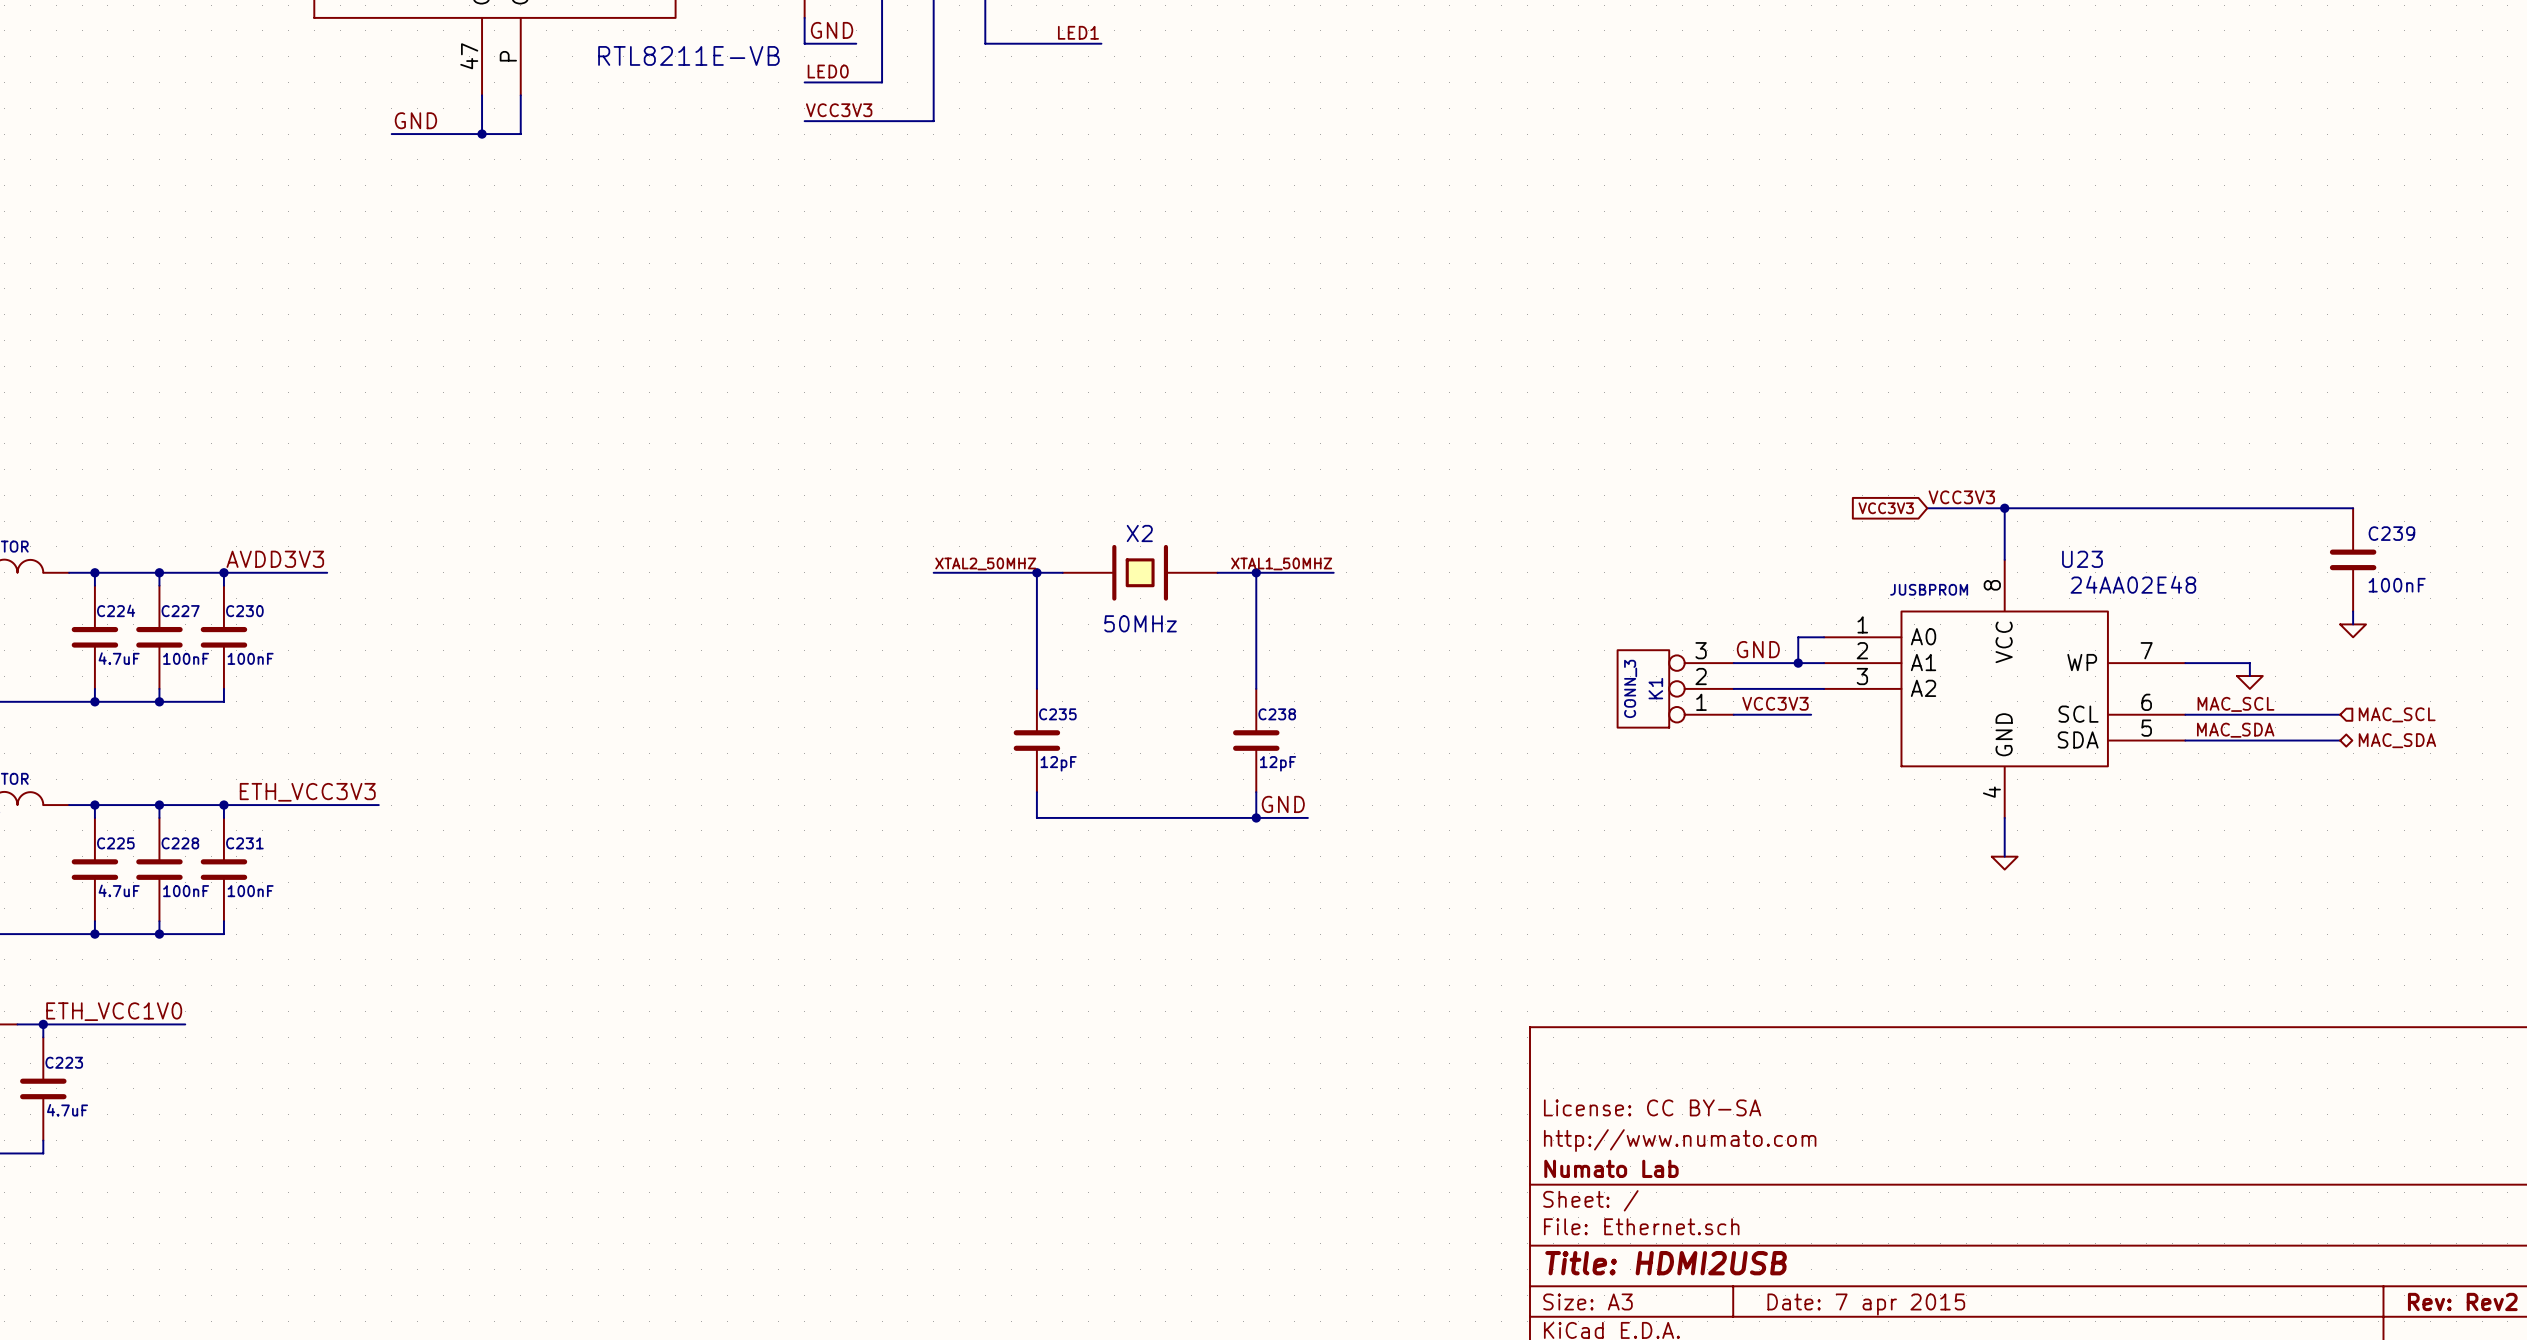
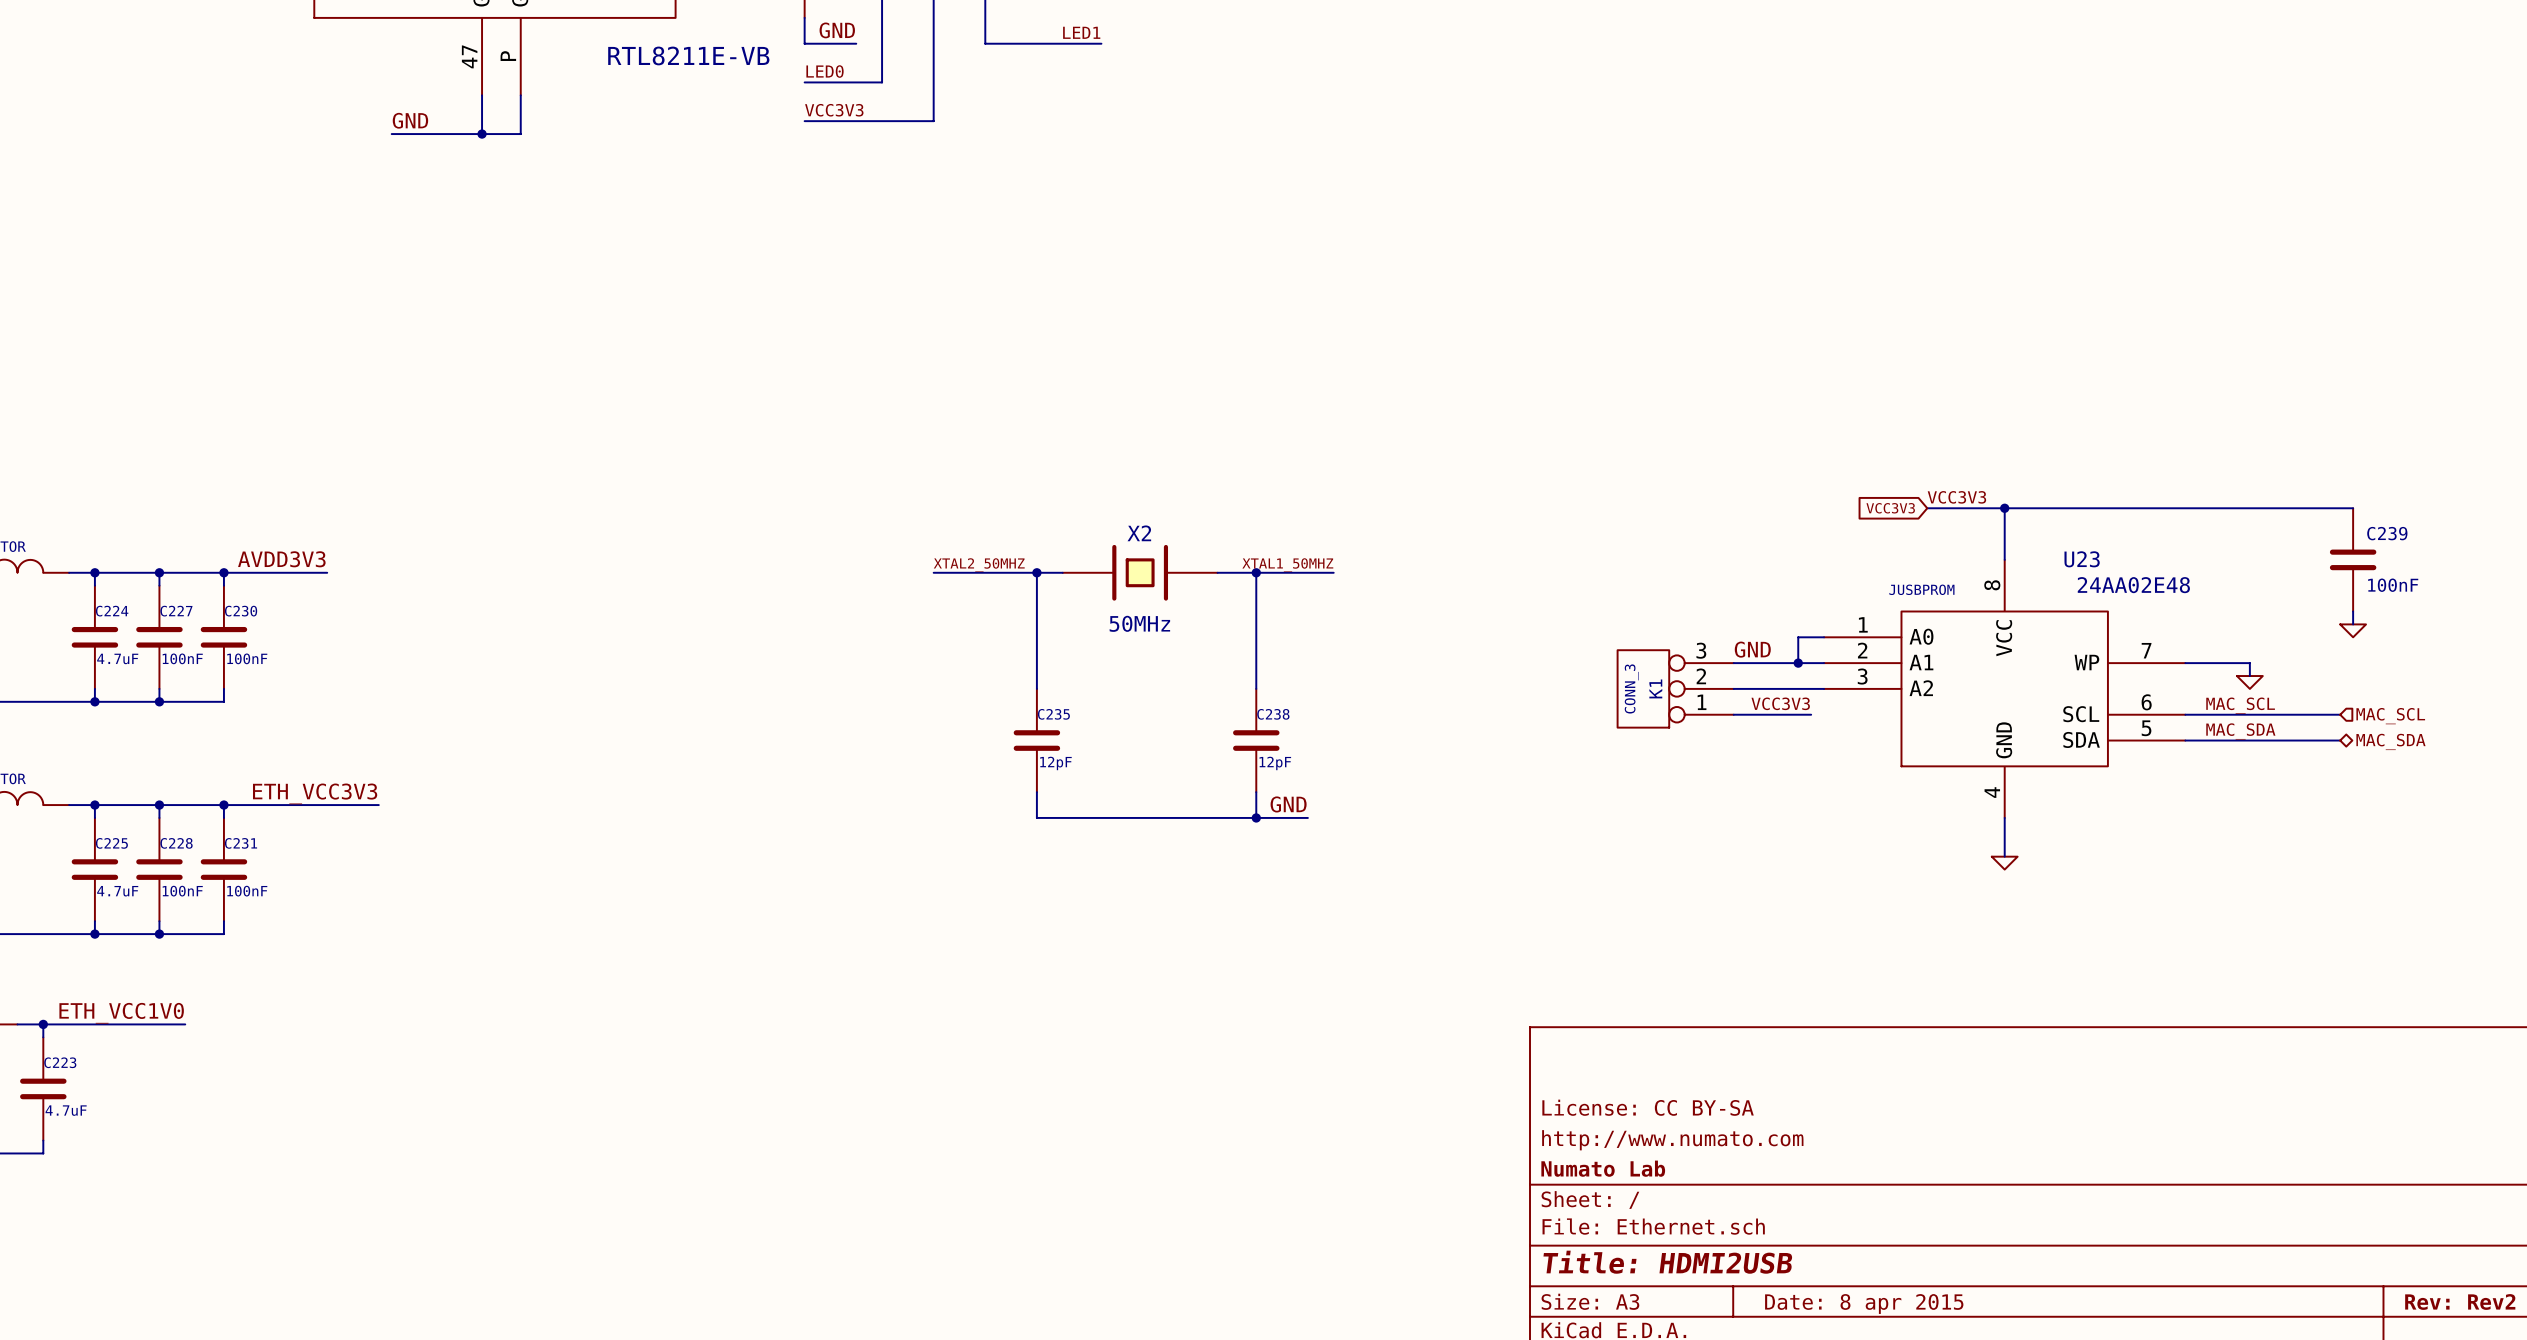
title block: Date: 7 apr 2015 (1866, 1304) -> Date: 8 apr 2015 (1864, 1304)

